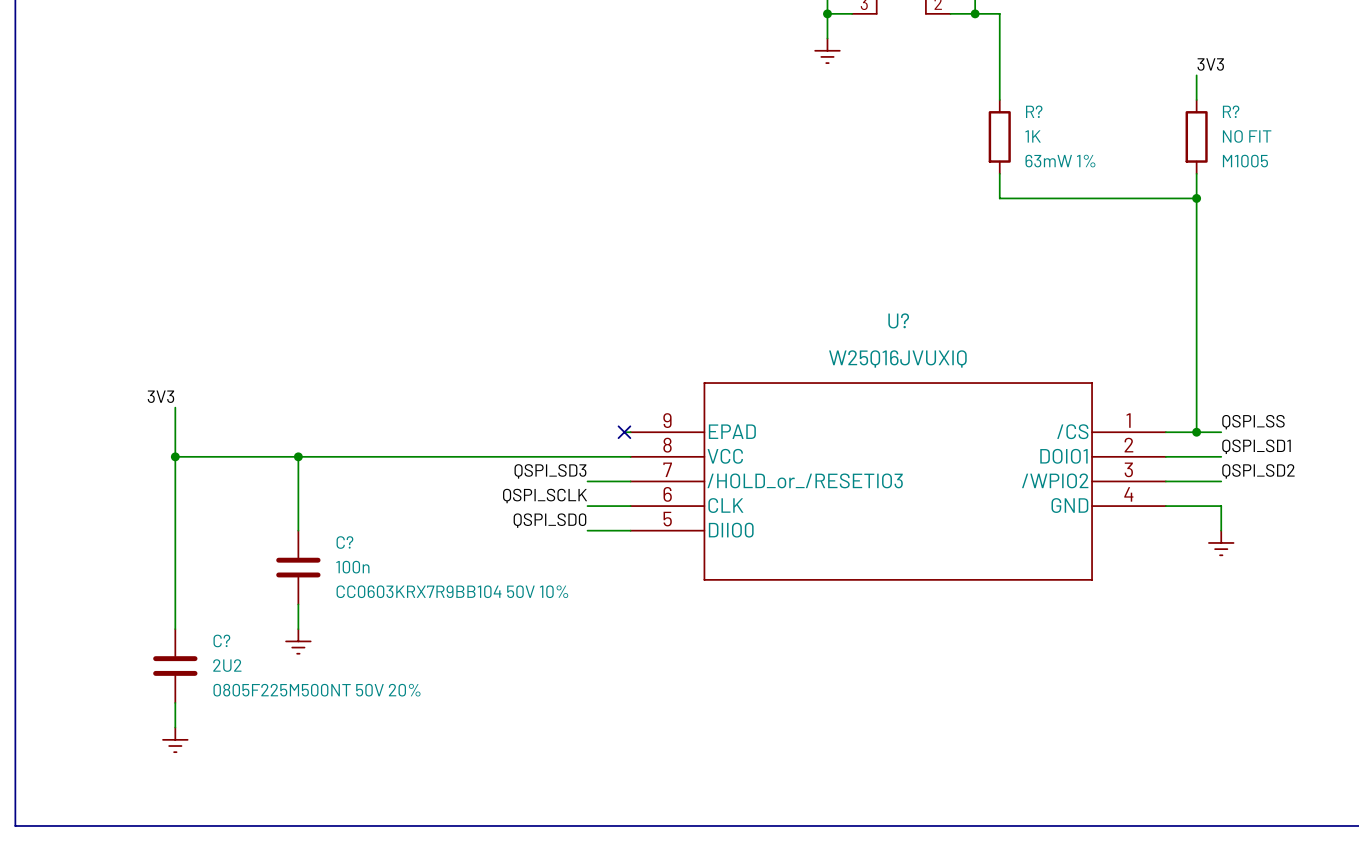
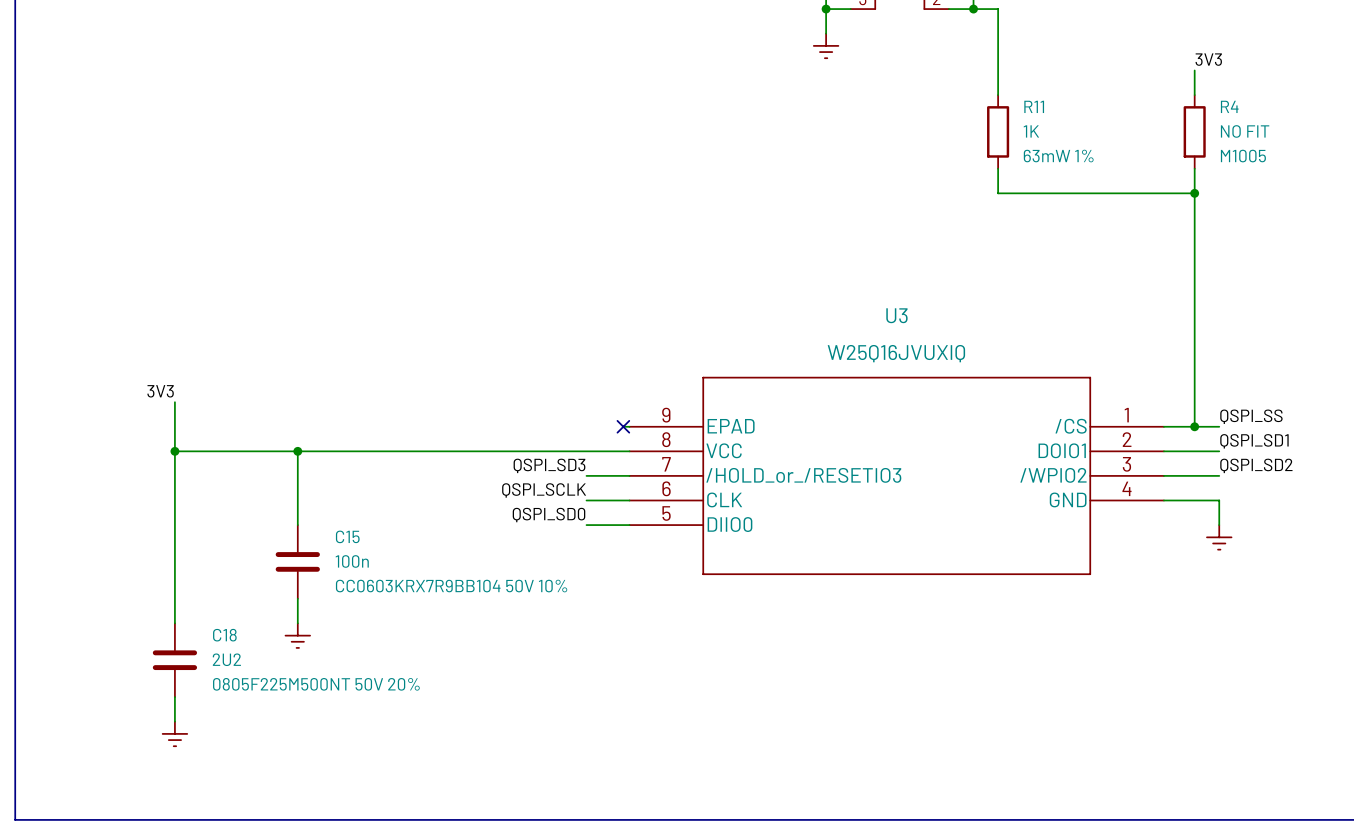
R? name: R? (1034, 111) -> R11 (1034, 106)
R? name: R? (1231, 111) -> R4 (1229, 106)
U? name: U? (898, 320) -> U3 (896, 315)
C? name: C? (344, 542) -> C15 (347, 536)
C? name: C? (221, 640) -> C18 (224, 635)

